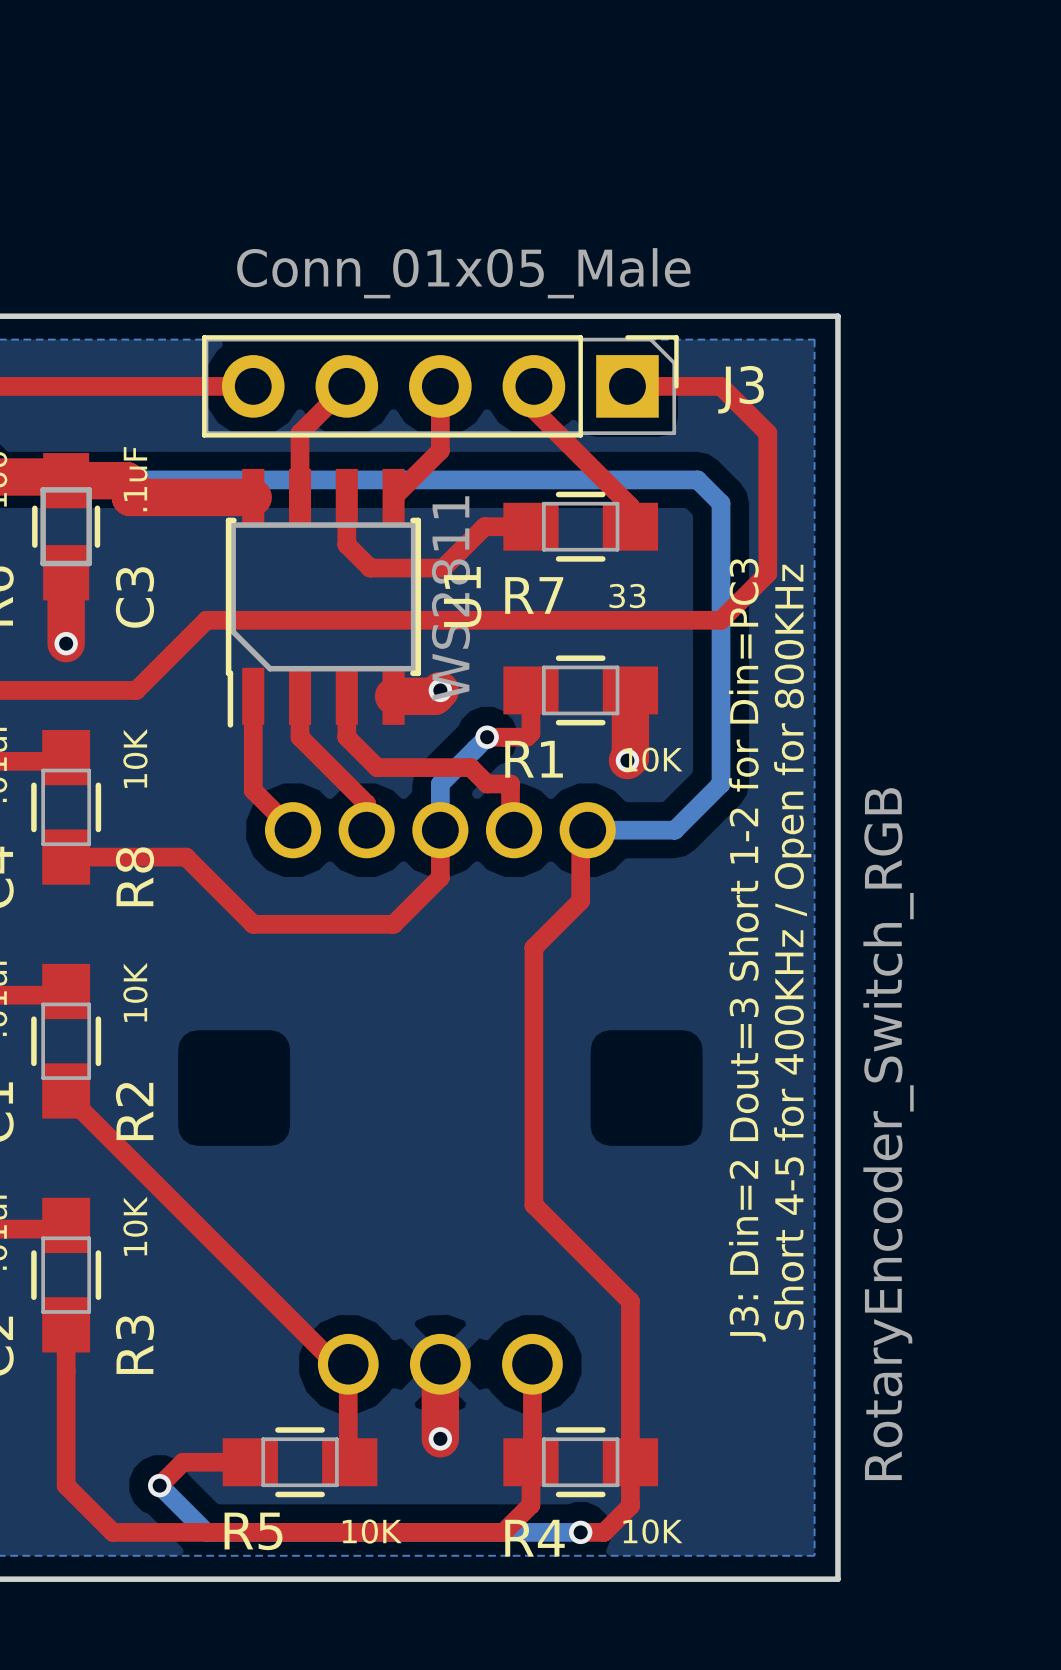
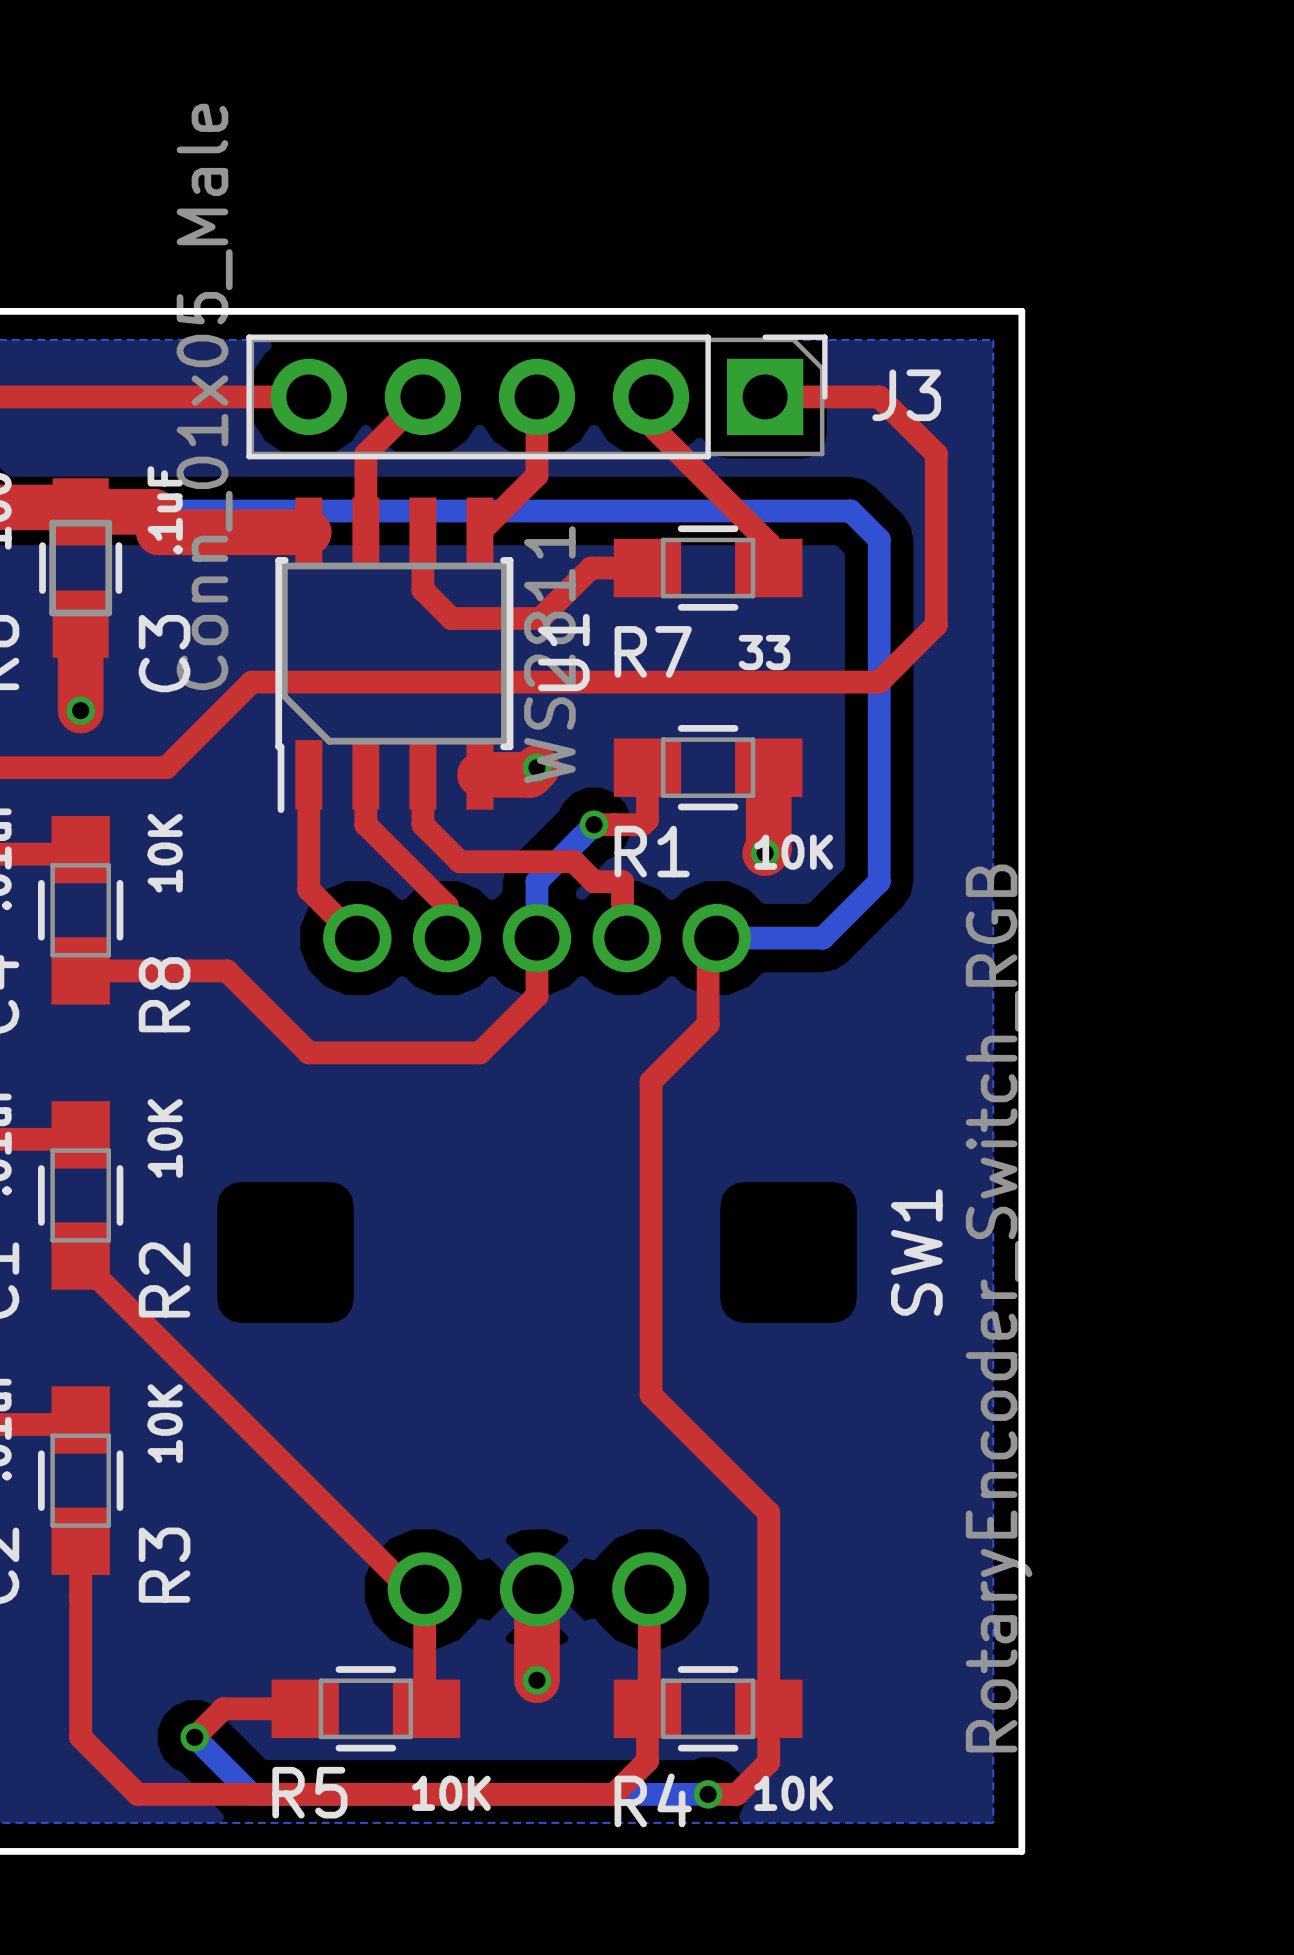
J3 value rotation: 0° (463, 273) -> 90° counterclockwise (204, 396)
text: Short 4-5 for 400KHz / Open for 800KHz (792, 947) -> none
text: J3: Din=2 Dout=3 Short 1-2 for Din=PC3 (747, 950) -> none
SW1 name: none -> SW1 (916, 1252)
SW1 value position: RotaryEncoder_Switch_RGB (888, 1134) -> RotaryEncoder_Switch_RGB (999, 1308)

